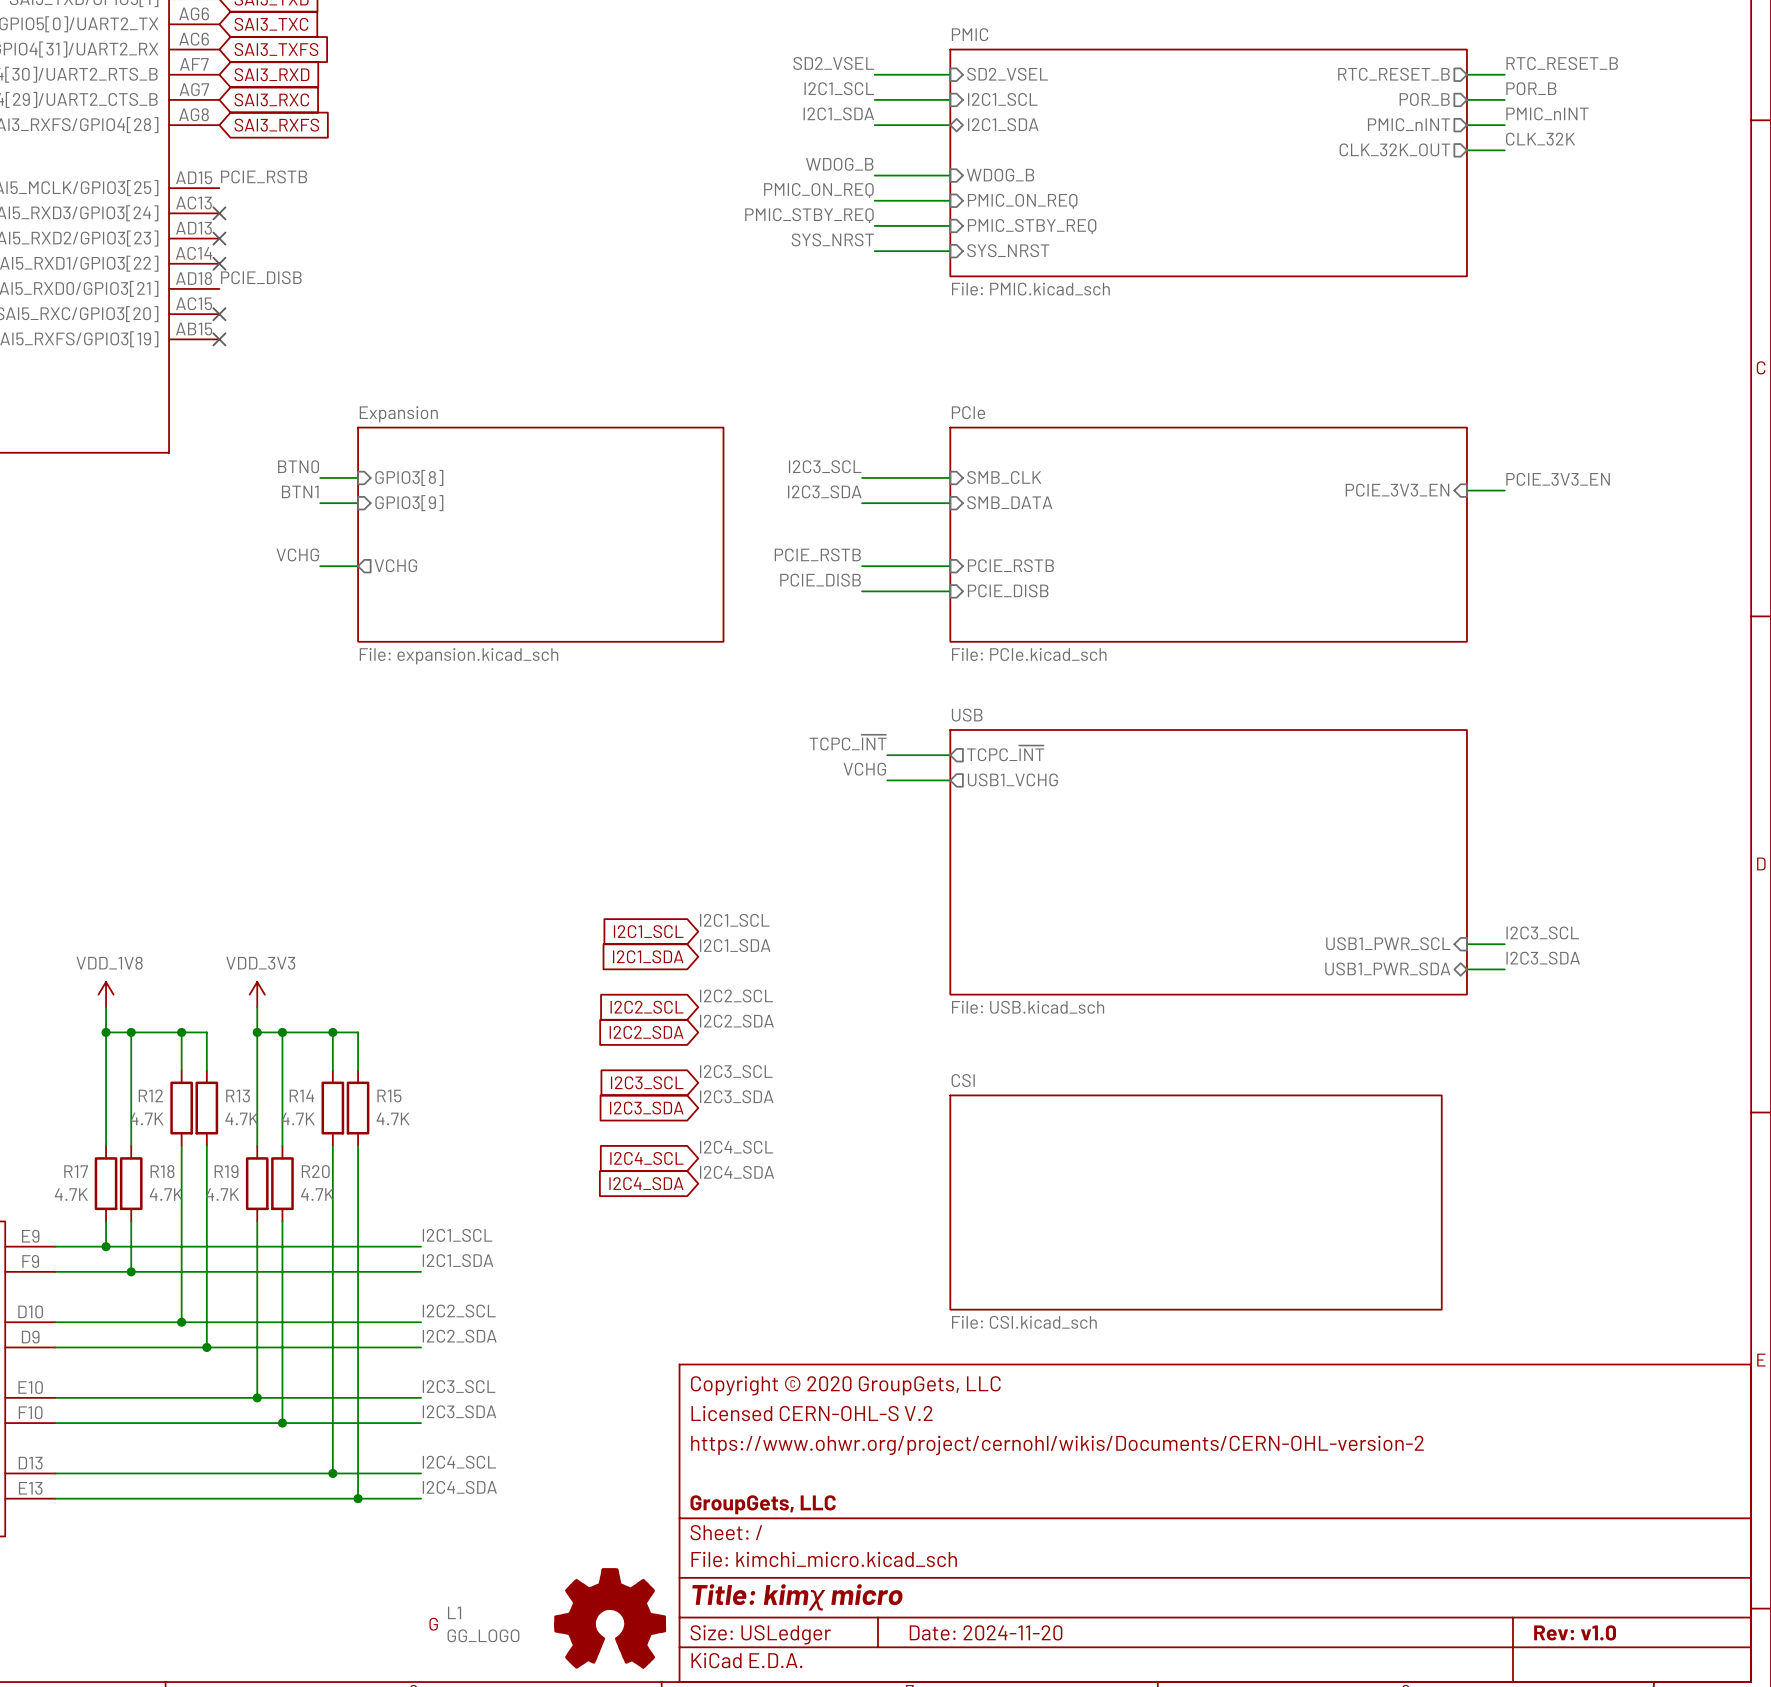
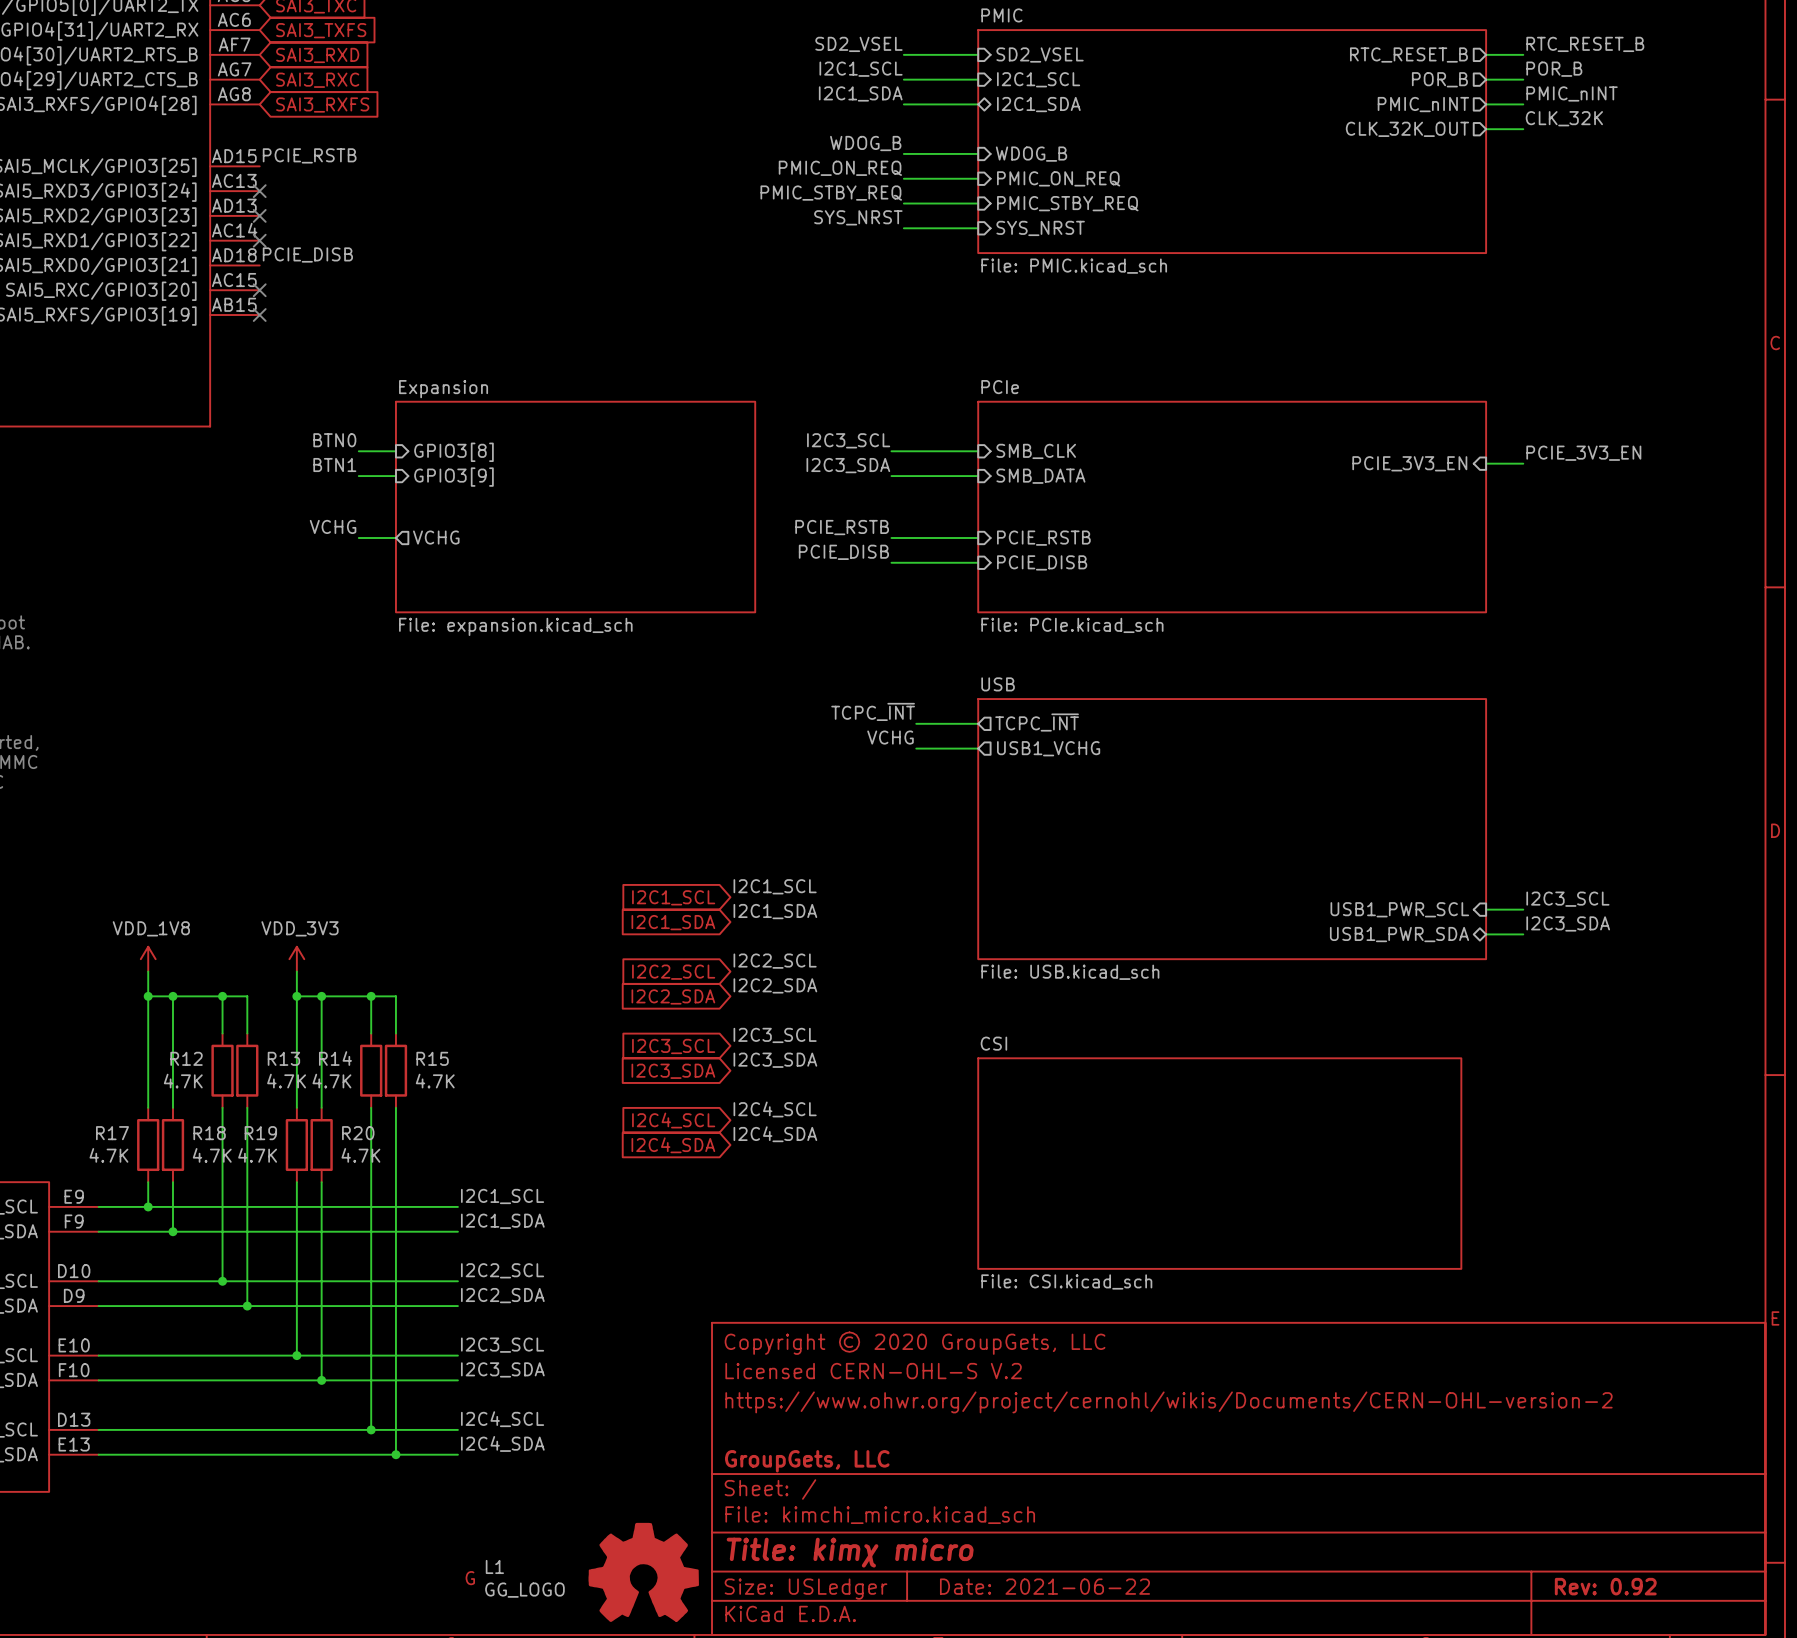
title block: Date: 2024-11-20 (986, 1632) -> Date: 2021-06-22 (1044, 1586)
title block: Rev: v1.0 (1575, 1632) -> Rev: 0.92 (1605, 1586)

